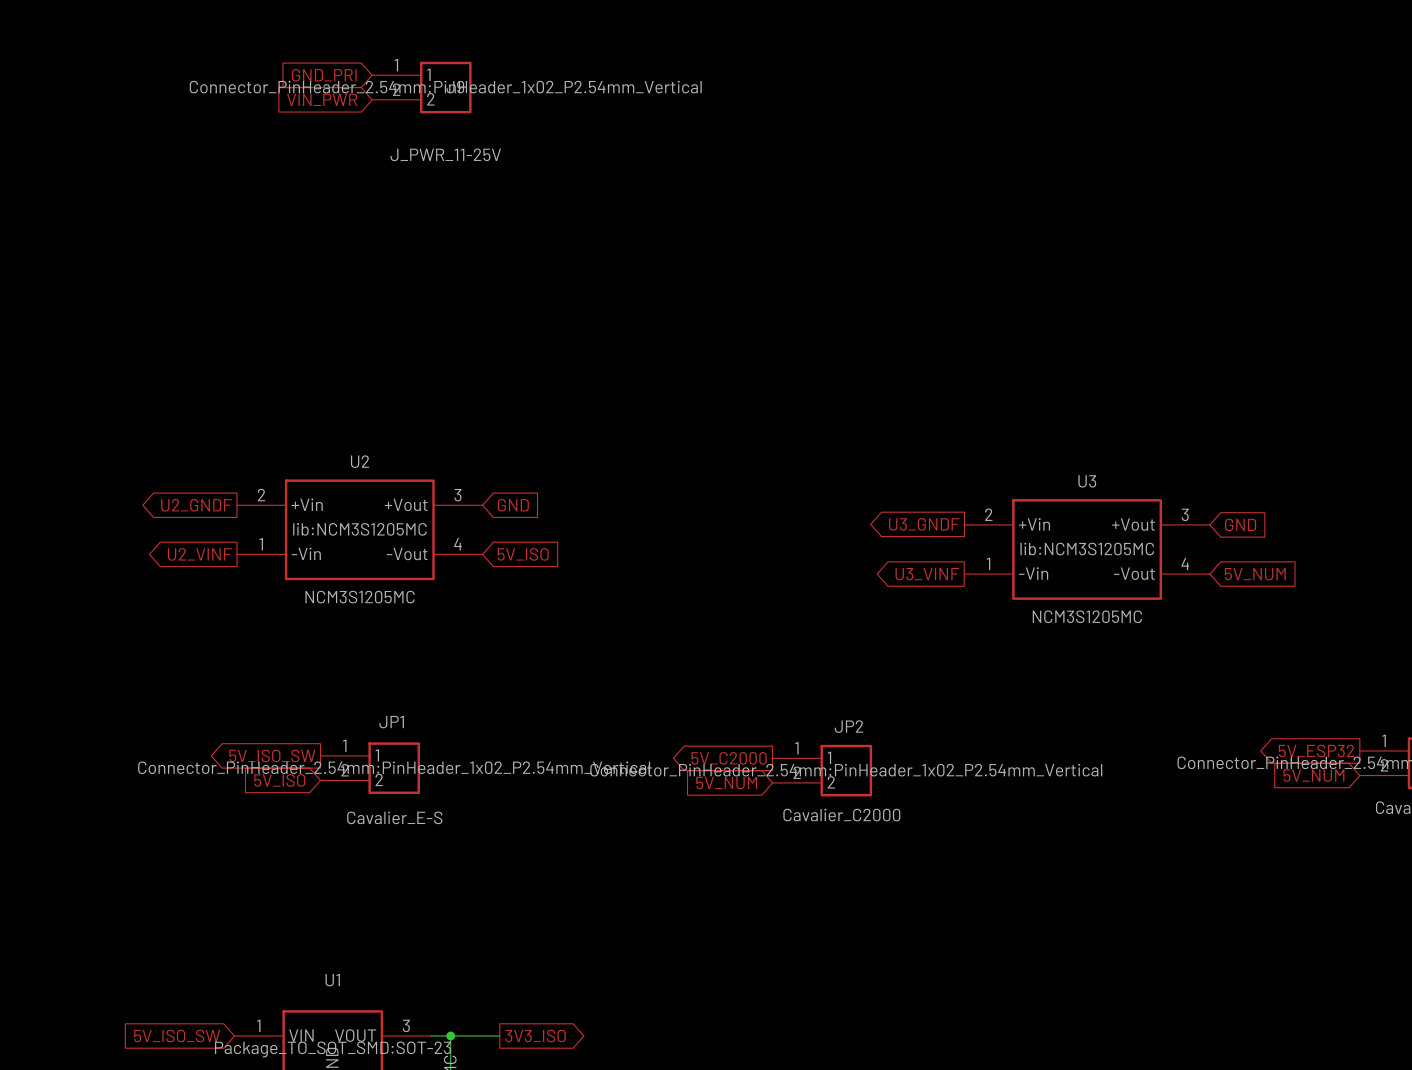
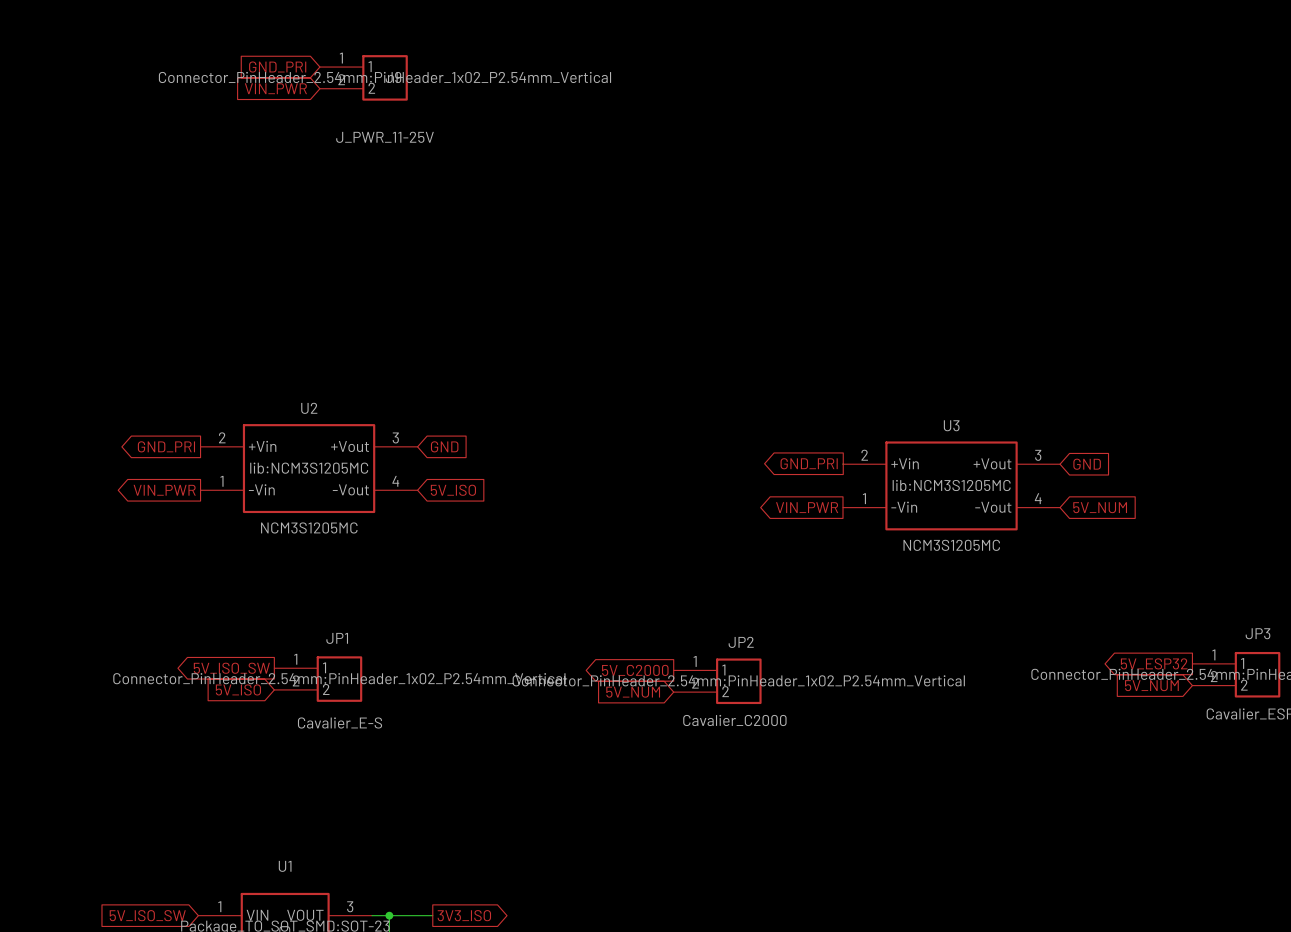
global label: U2_GNDF (196, 505) -> GND_PRI (166, 446)
global label: U3_GNDF (924, 524) -> GND_PRI (809, 463)
global label: U2_VINF (199, 554) -> VIN_PWR (164, 490)
global label: U3_VINF (927, 574) -> VIN_PWR (807, 507)

